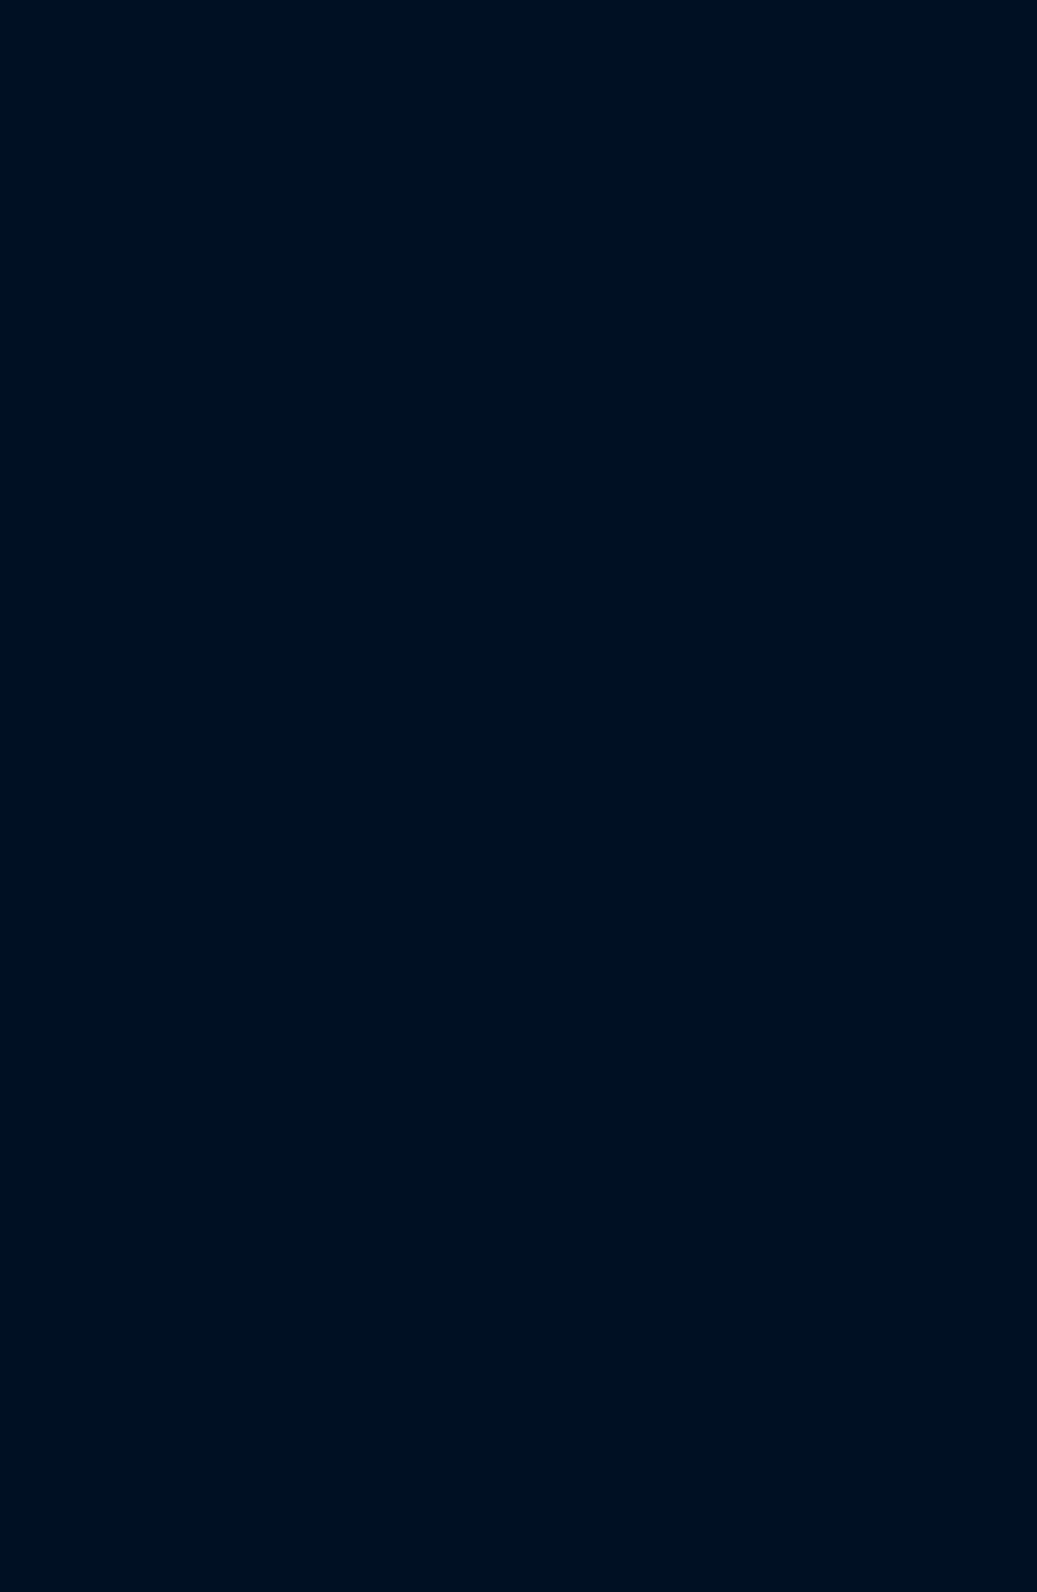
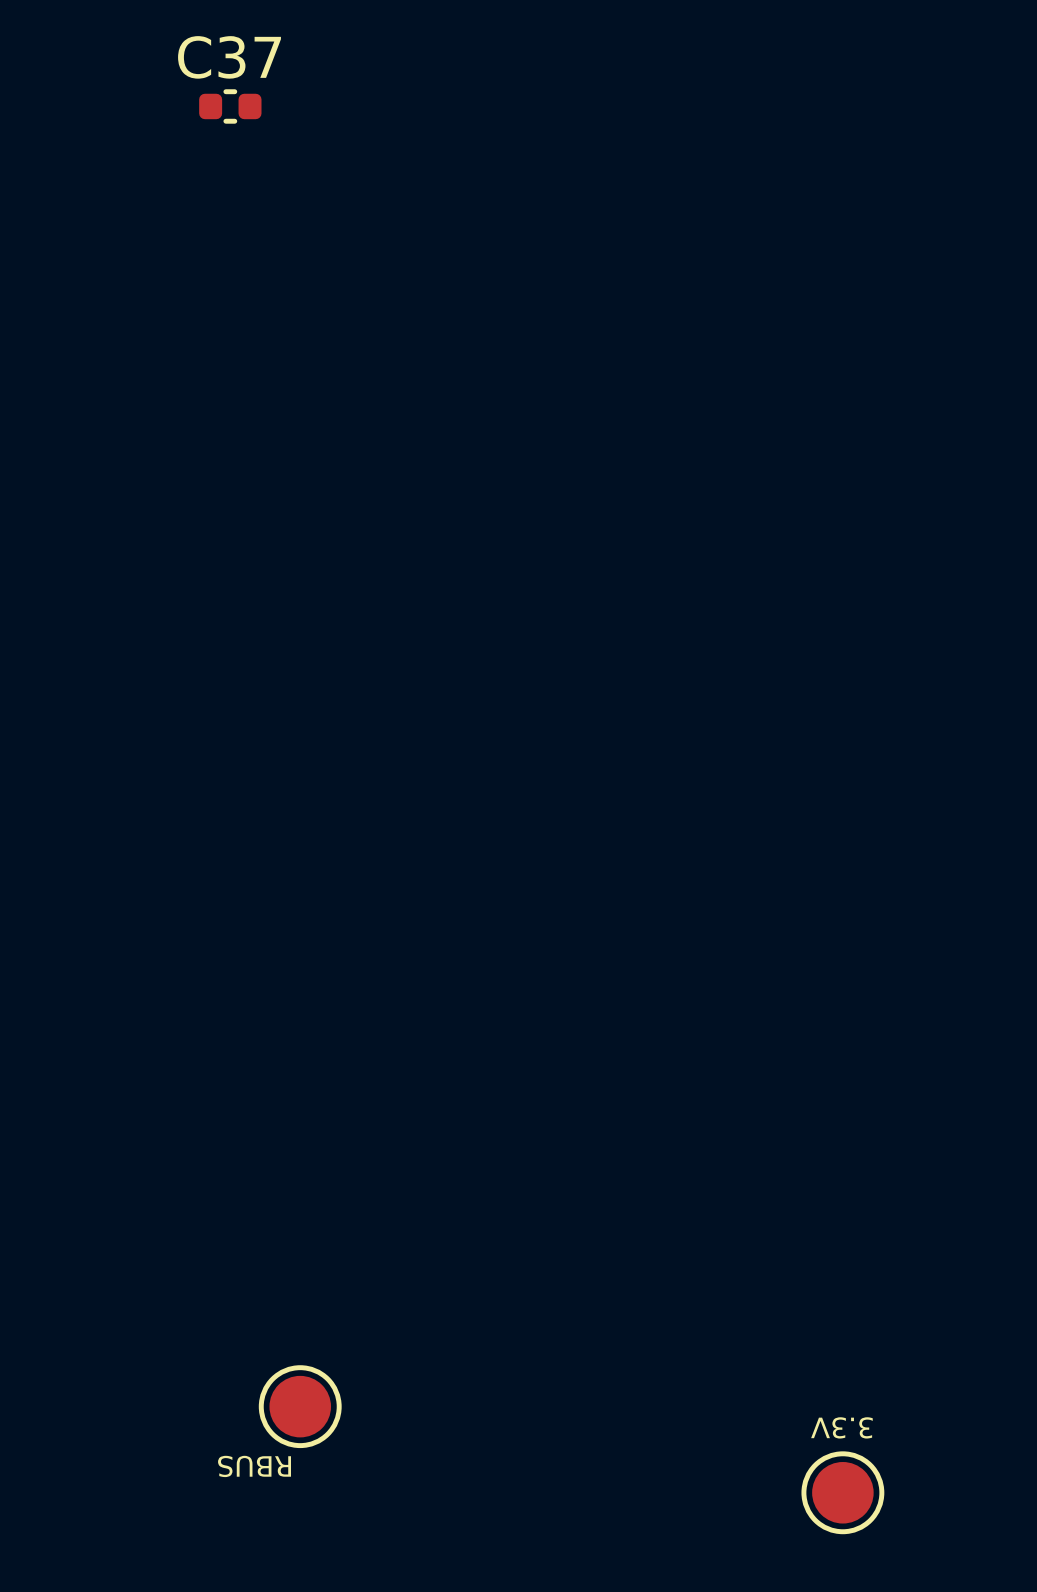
C37: none -> (230, 106)
part: none -> (300, 1406)
part: none -> (842, 1492)

